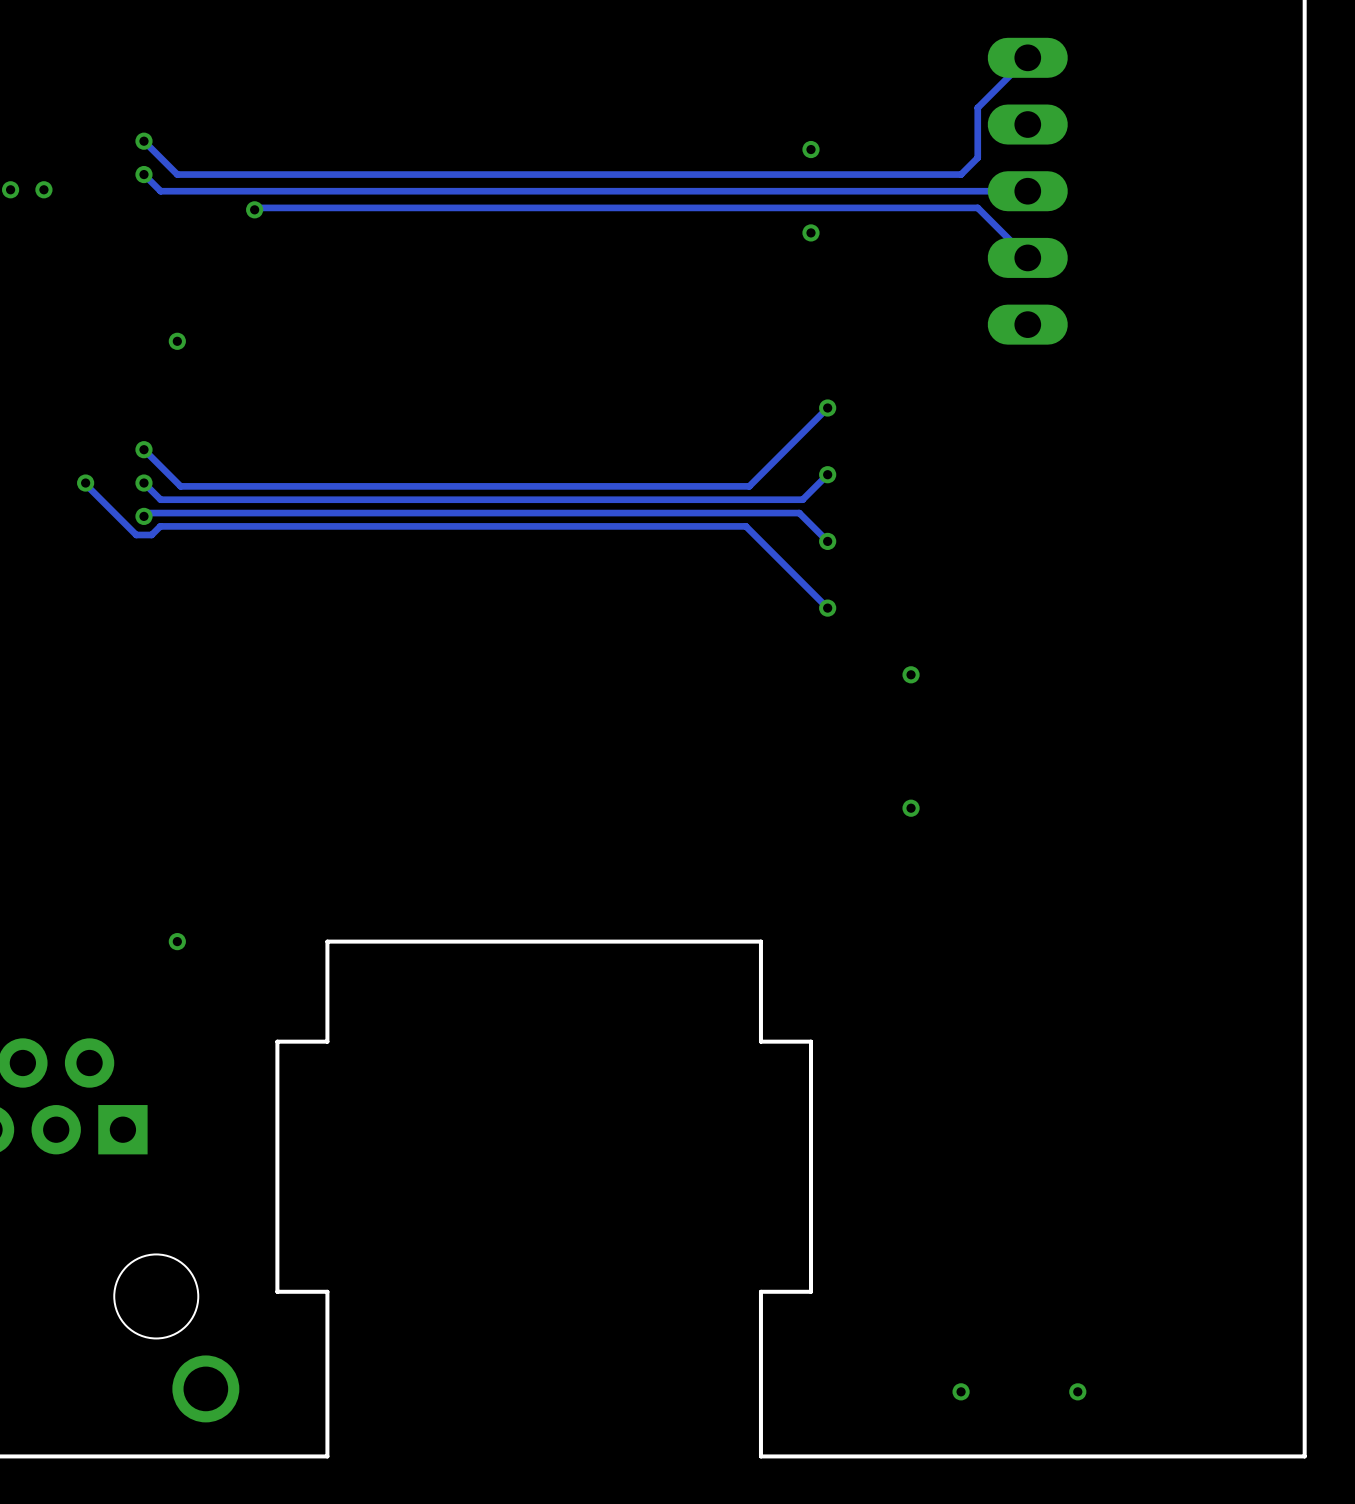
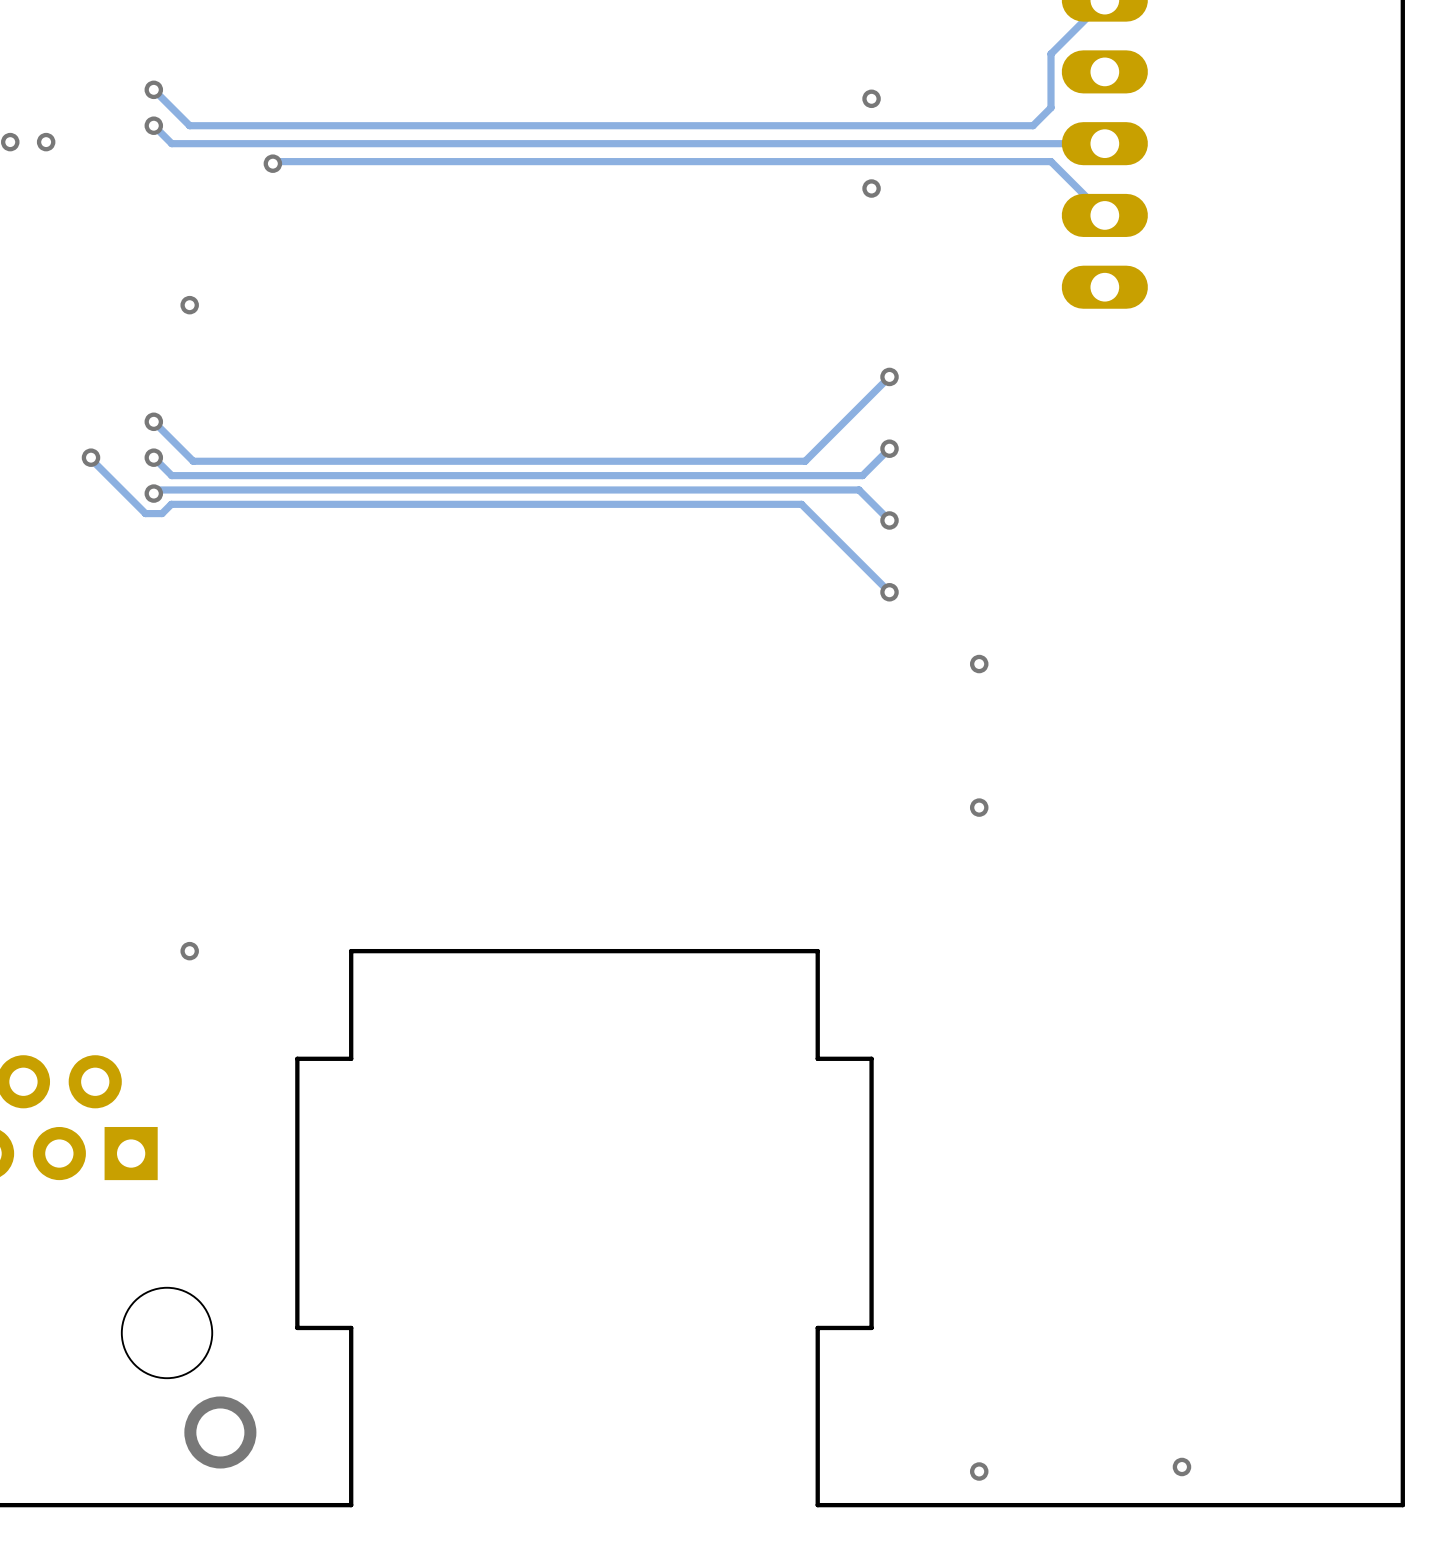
via position: (961, 1391) -> (979, 1471)
via position: (1077, 1391) -> (1181, 1466)

